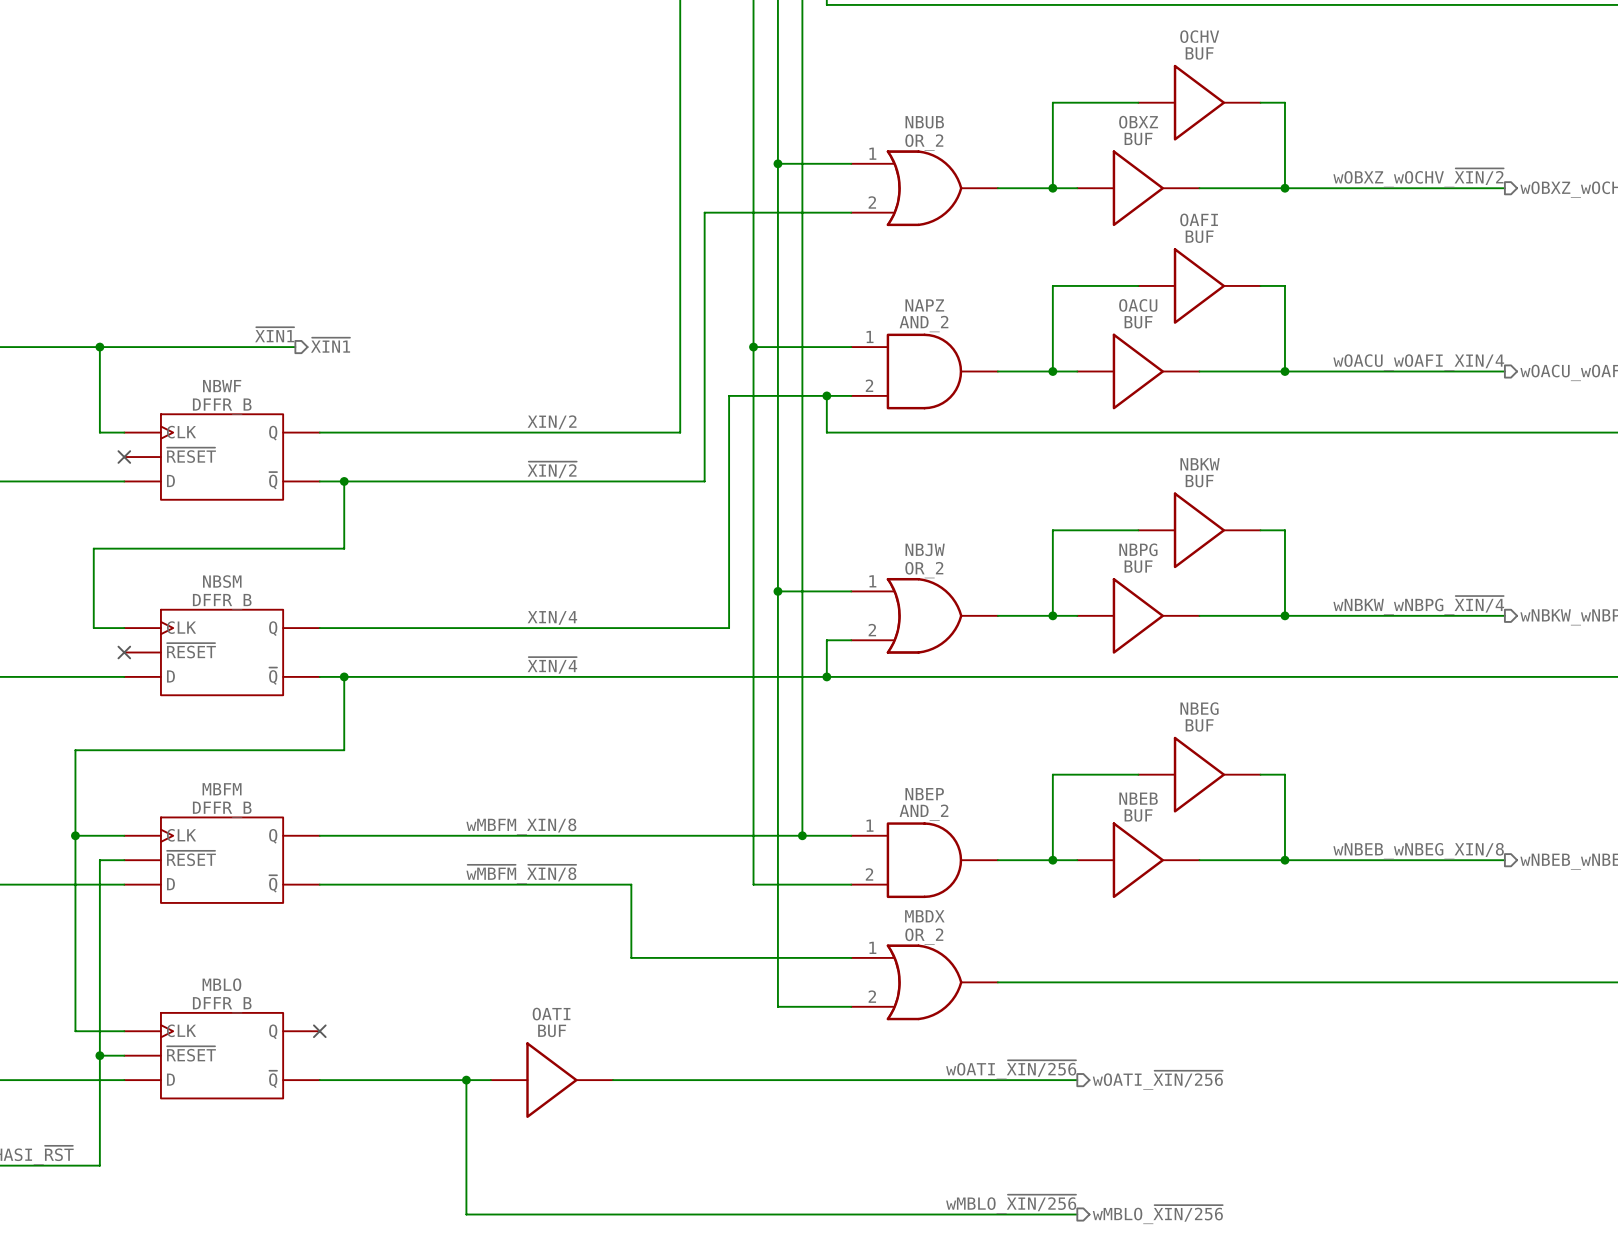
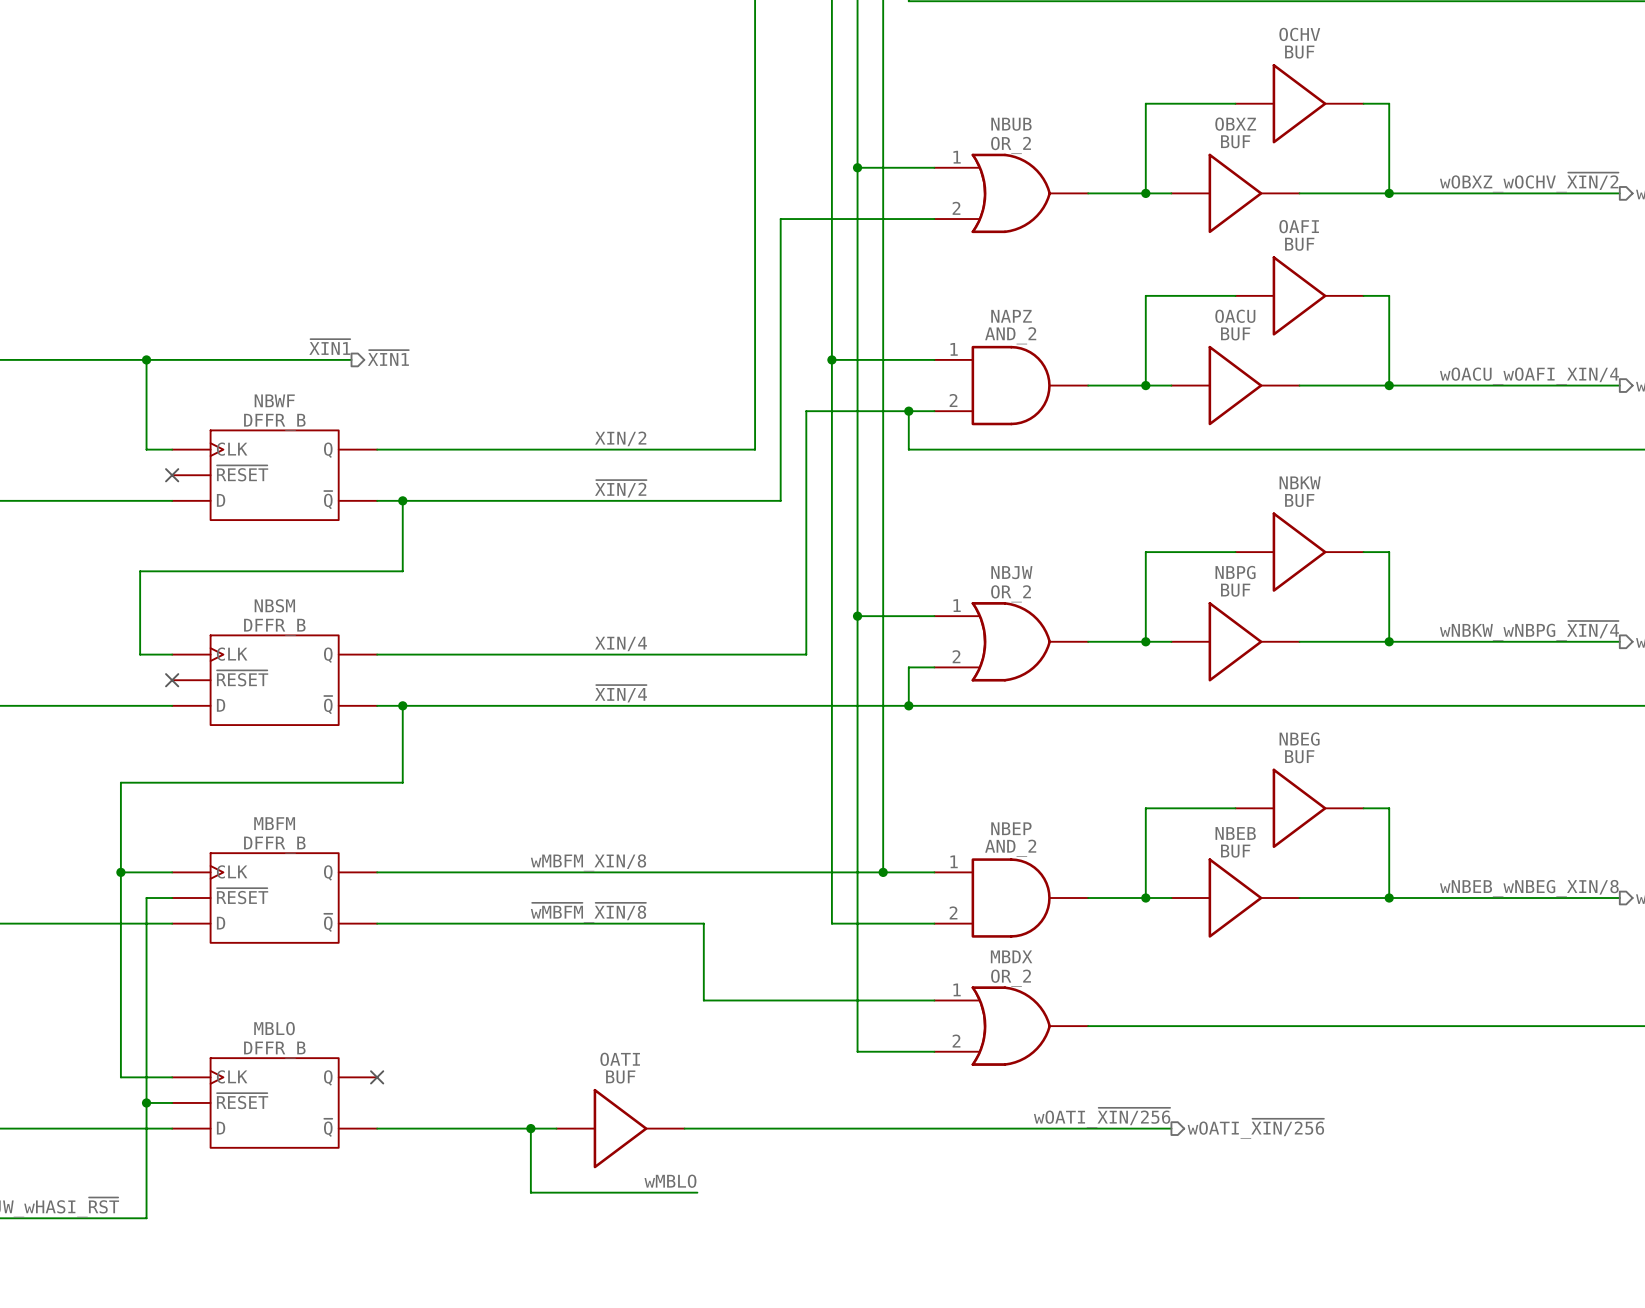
label: none -> wMBLO (670, 1181)
wire: (466, 1141) (466, 1214) (1077, 1214) -> (530, 1192) (697, 1192)
label: wMBLO_~{XIN/256} (1011, 1204) -> none
hierarchical label: wMBLO_~{XIN/256} (1157, 1214) -> none

